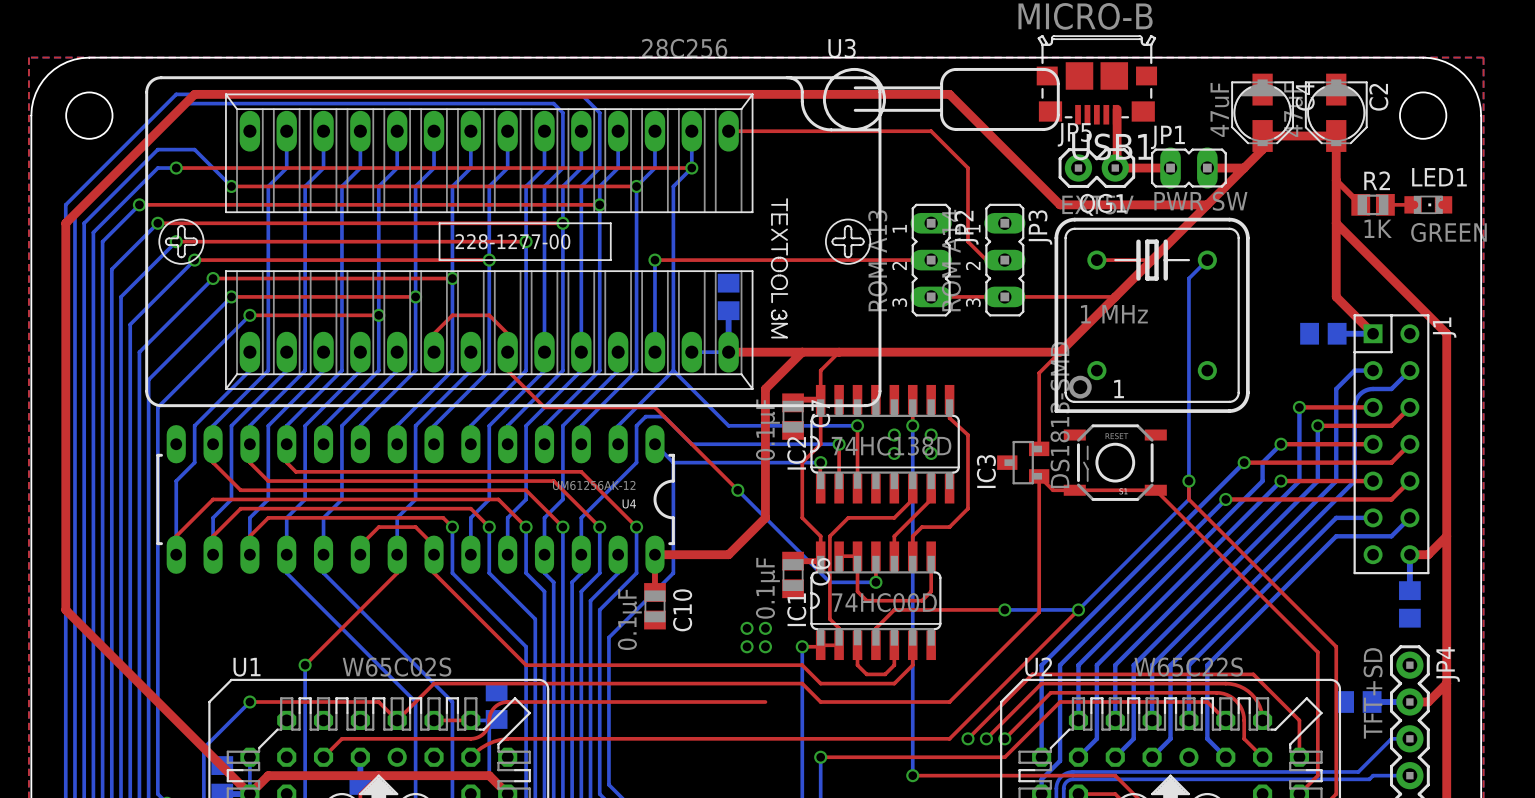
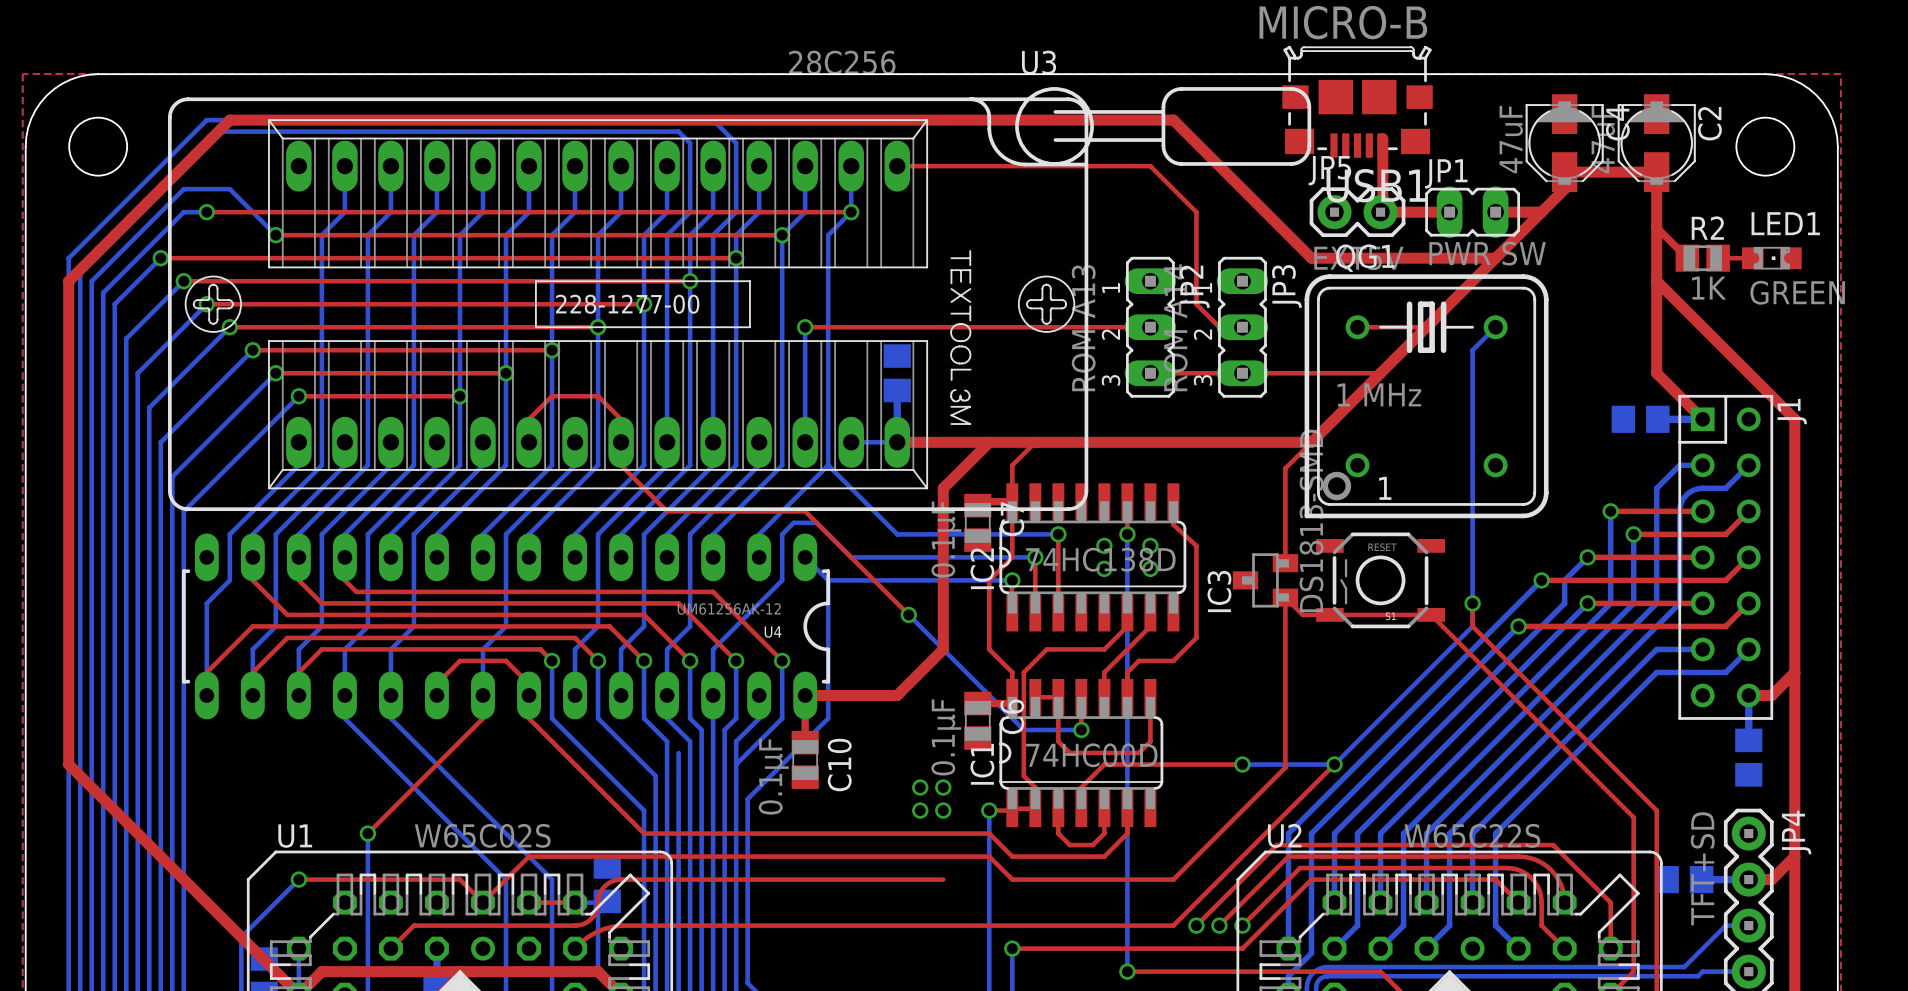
bottom track: (562, 573) (562, 591) -> (690, 718) (701, 729)
bottom track: (581, 573) (572, 582) -> (713, 718) (713, 741)
bottom track: (553, 582) (553, 600) -> (678, 729) (690, 741)
bottom track: (590, 582) (581, 591) -> (724, 729) (724, 753)
bottom track: (599, 591) (590, 600) -> (736, 741) (736, 764)

